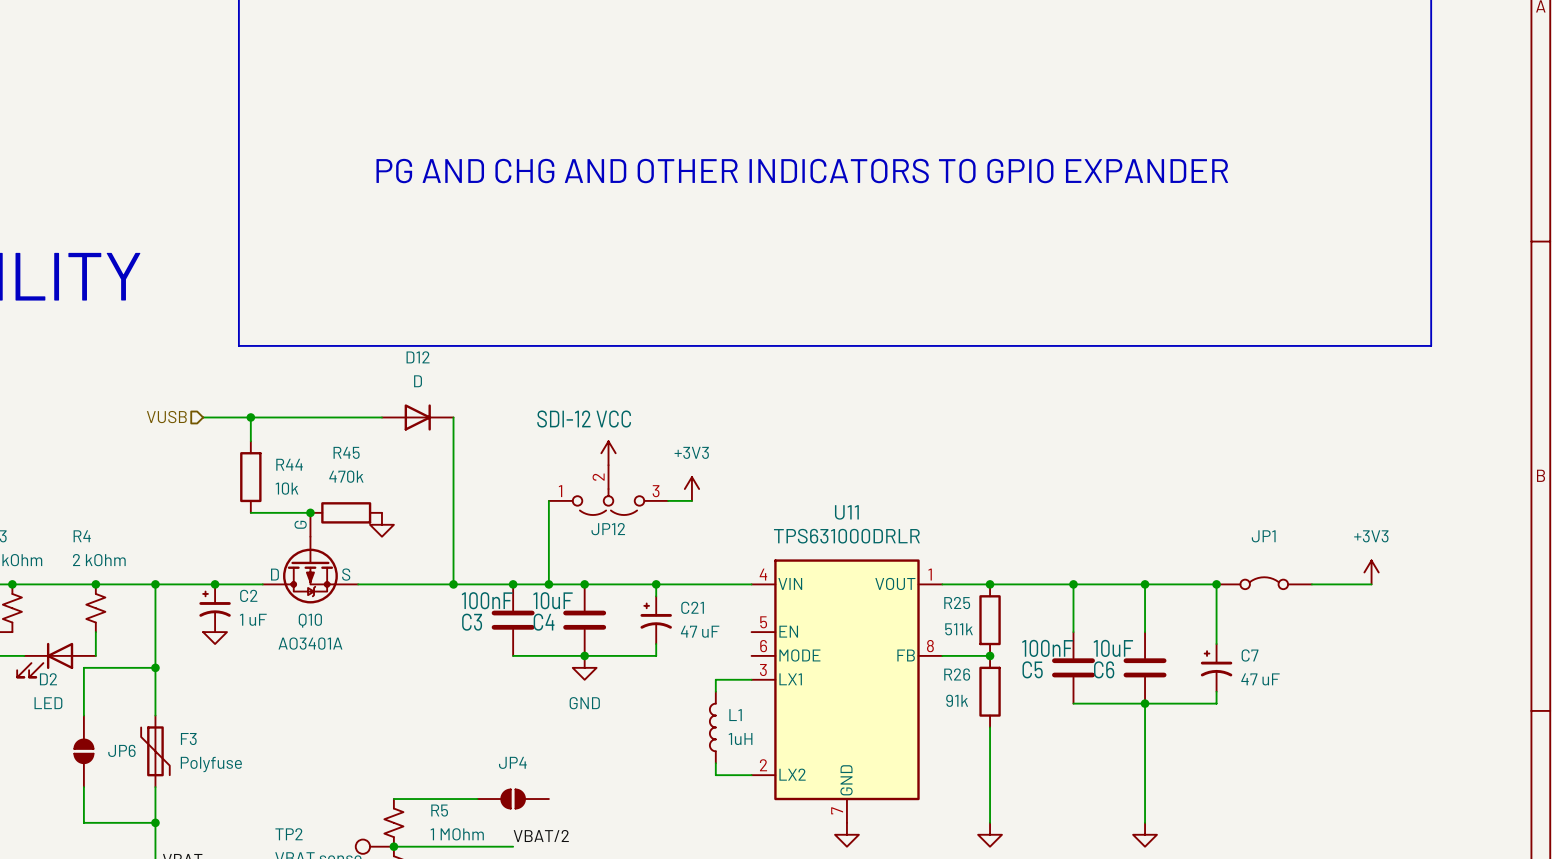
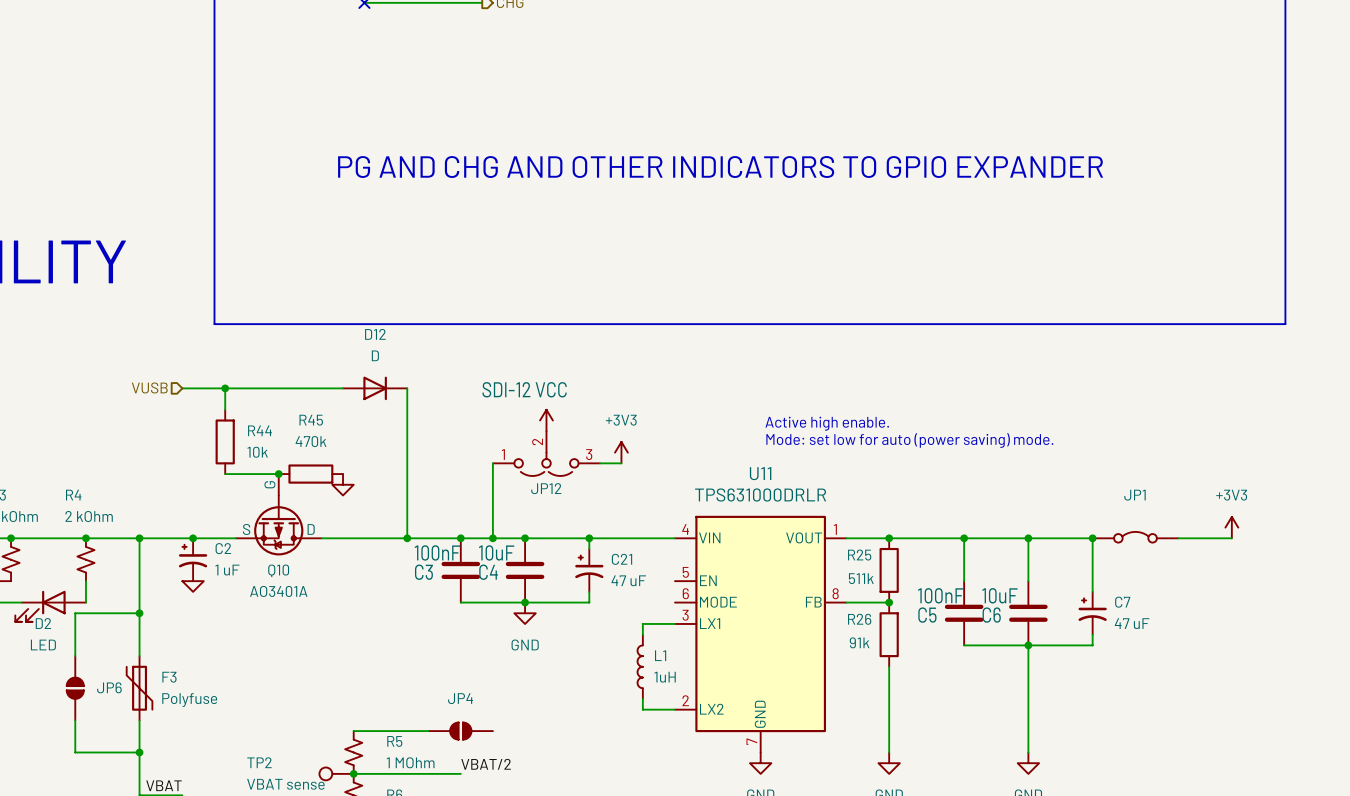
text: none -> Active high enable. (827, 423)
text: none -> Mode: set low for auto (power saving) mode. (909, 440)
Q10 flip: as is (310, 570) -> left-right (278, 525)

